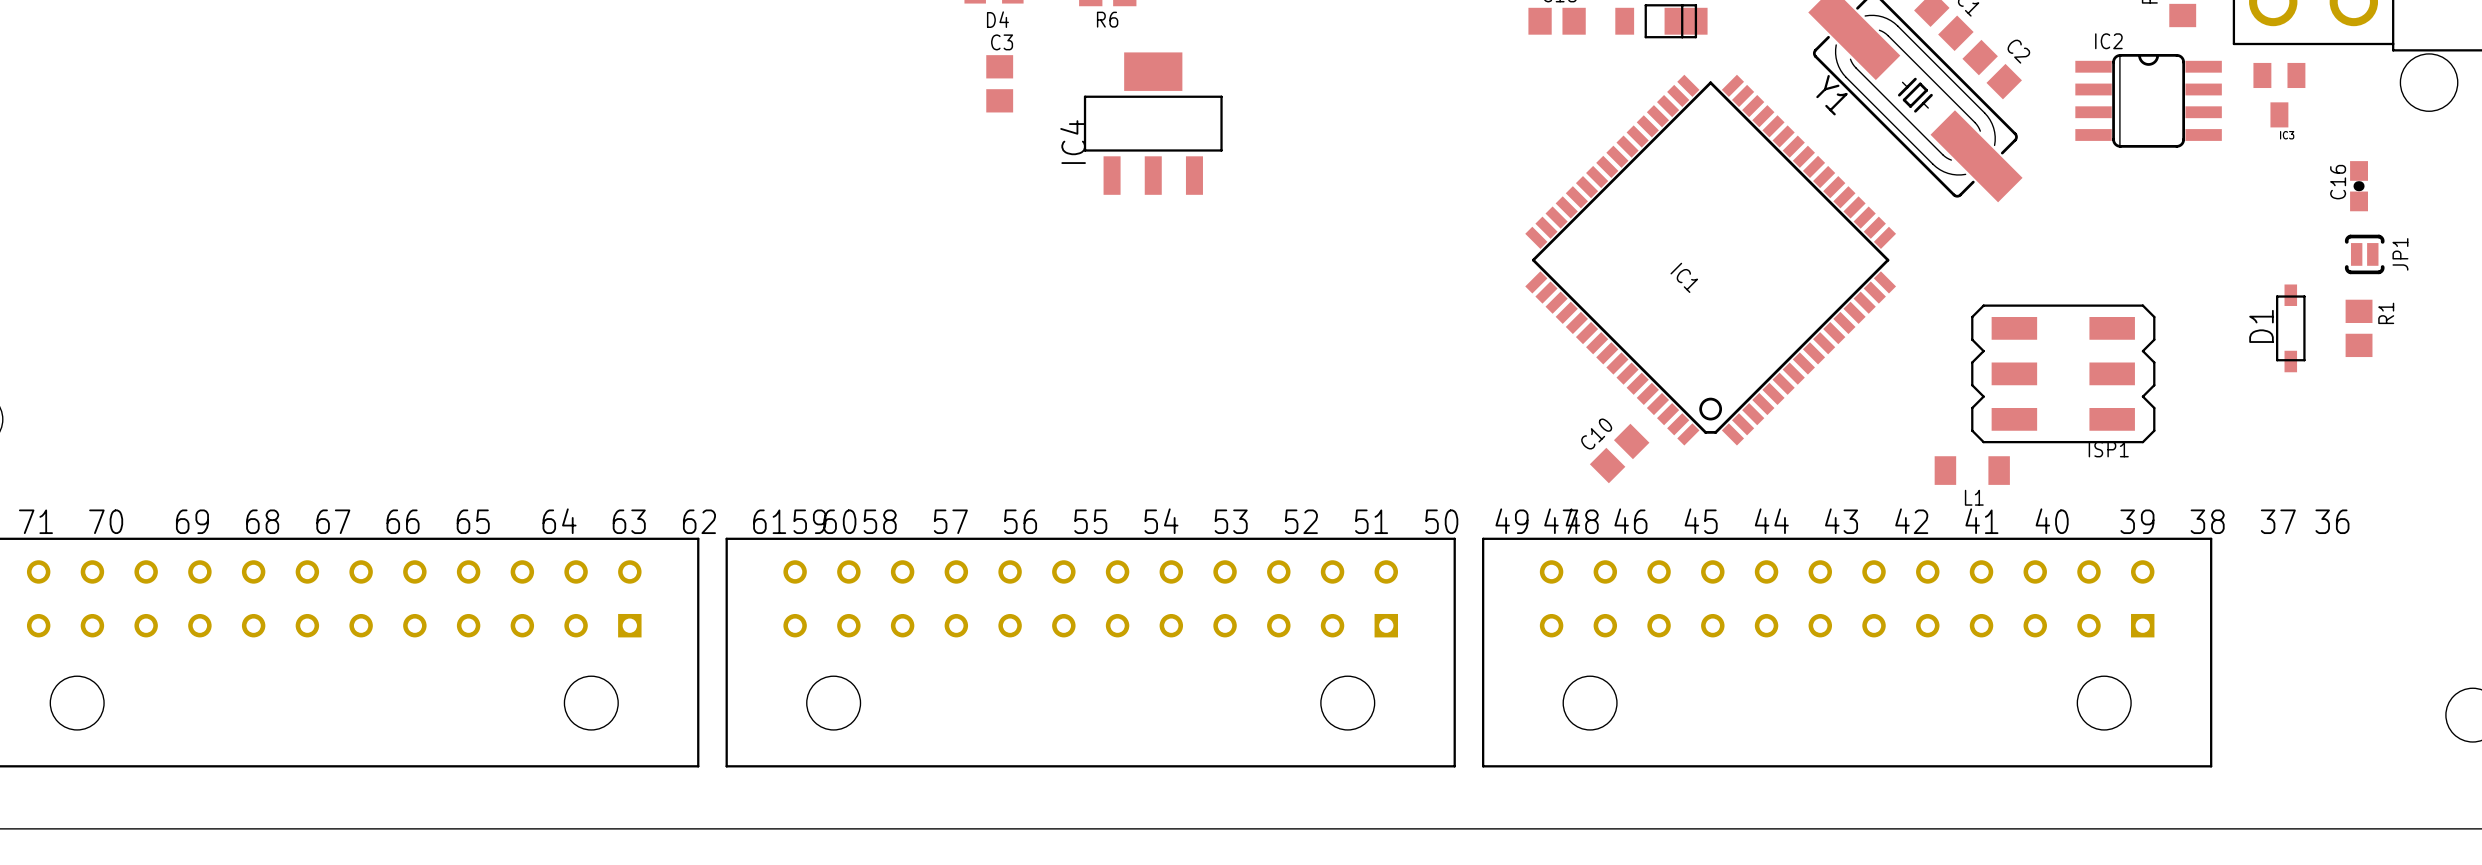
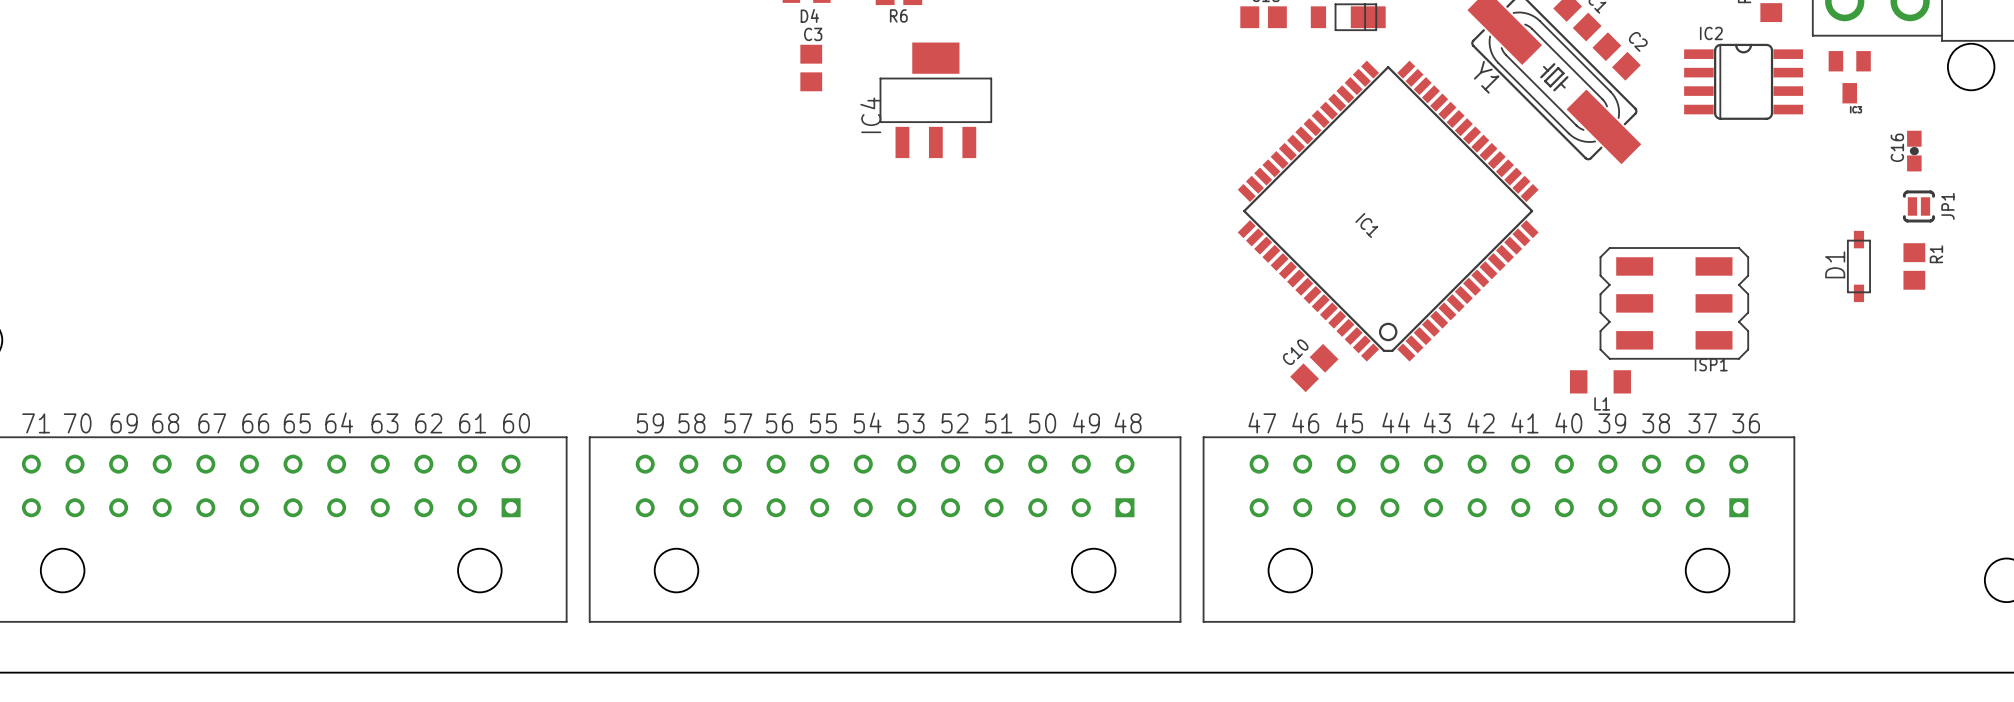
text: none -> 70 (77, 423)
text: none -> 69 (124, 423)
text: none -> 68 (165, 423)
text: none -> 67 (212, 423)
text: none -> 66 (255, 423)
text: none -> 65 (297, 423)
text: none -> 64 (339, 422)
text: 71 70 69 68 67 66 65 64 63 62 61 60 (437, 521) -> 71 (36, 423)
text: none -> 63 (384, 423)
text: none -> 62 (428, 423)
text: none -> 61 (472, 423)
text: none -> 60 (516, 423)
text: none -> 58 (691, 423)
text: none -> 57 (738, 423)
text: none -> 56 (779, 423)
text: none -> 55 (823, 423)
text: none -> 54 (867, 422)
text: none -> 53 (911, 423)
text: none -> 52 (954, 423)
text: 59 58 57 56 55 54 53 52 51 50 49 48 (1196, 521) -> 59 (650, 423)
text: none -> 51 (998, 423)
text: none -> 50 (1042, 423)
text: none -> 49 (1086, 422)
text: none -> 48 (1128, 422)
text: none -> 46 (1305, 422)
text: none -> 45 (1349, 422)
text: none -> 44 (1396, 422)
text: none -> 43 (1437, 422)
text: none -> 42 (1481, 422)
text: none -> 41 (1524, 422)
text: none -> 40 (1568, 422)
text: 47 46 45 44 43 42 41 40 39 38 37 36 (1946, 521) -> 47 (1262, 422)
text: none -> 39 (1612, 423)
text: none -> 38 (1656, 423)
text: none -> 37 (1702, 423)
text: none -> 36 (1746, 423)

